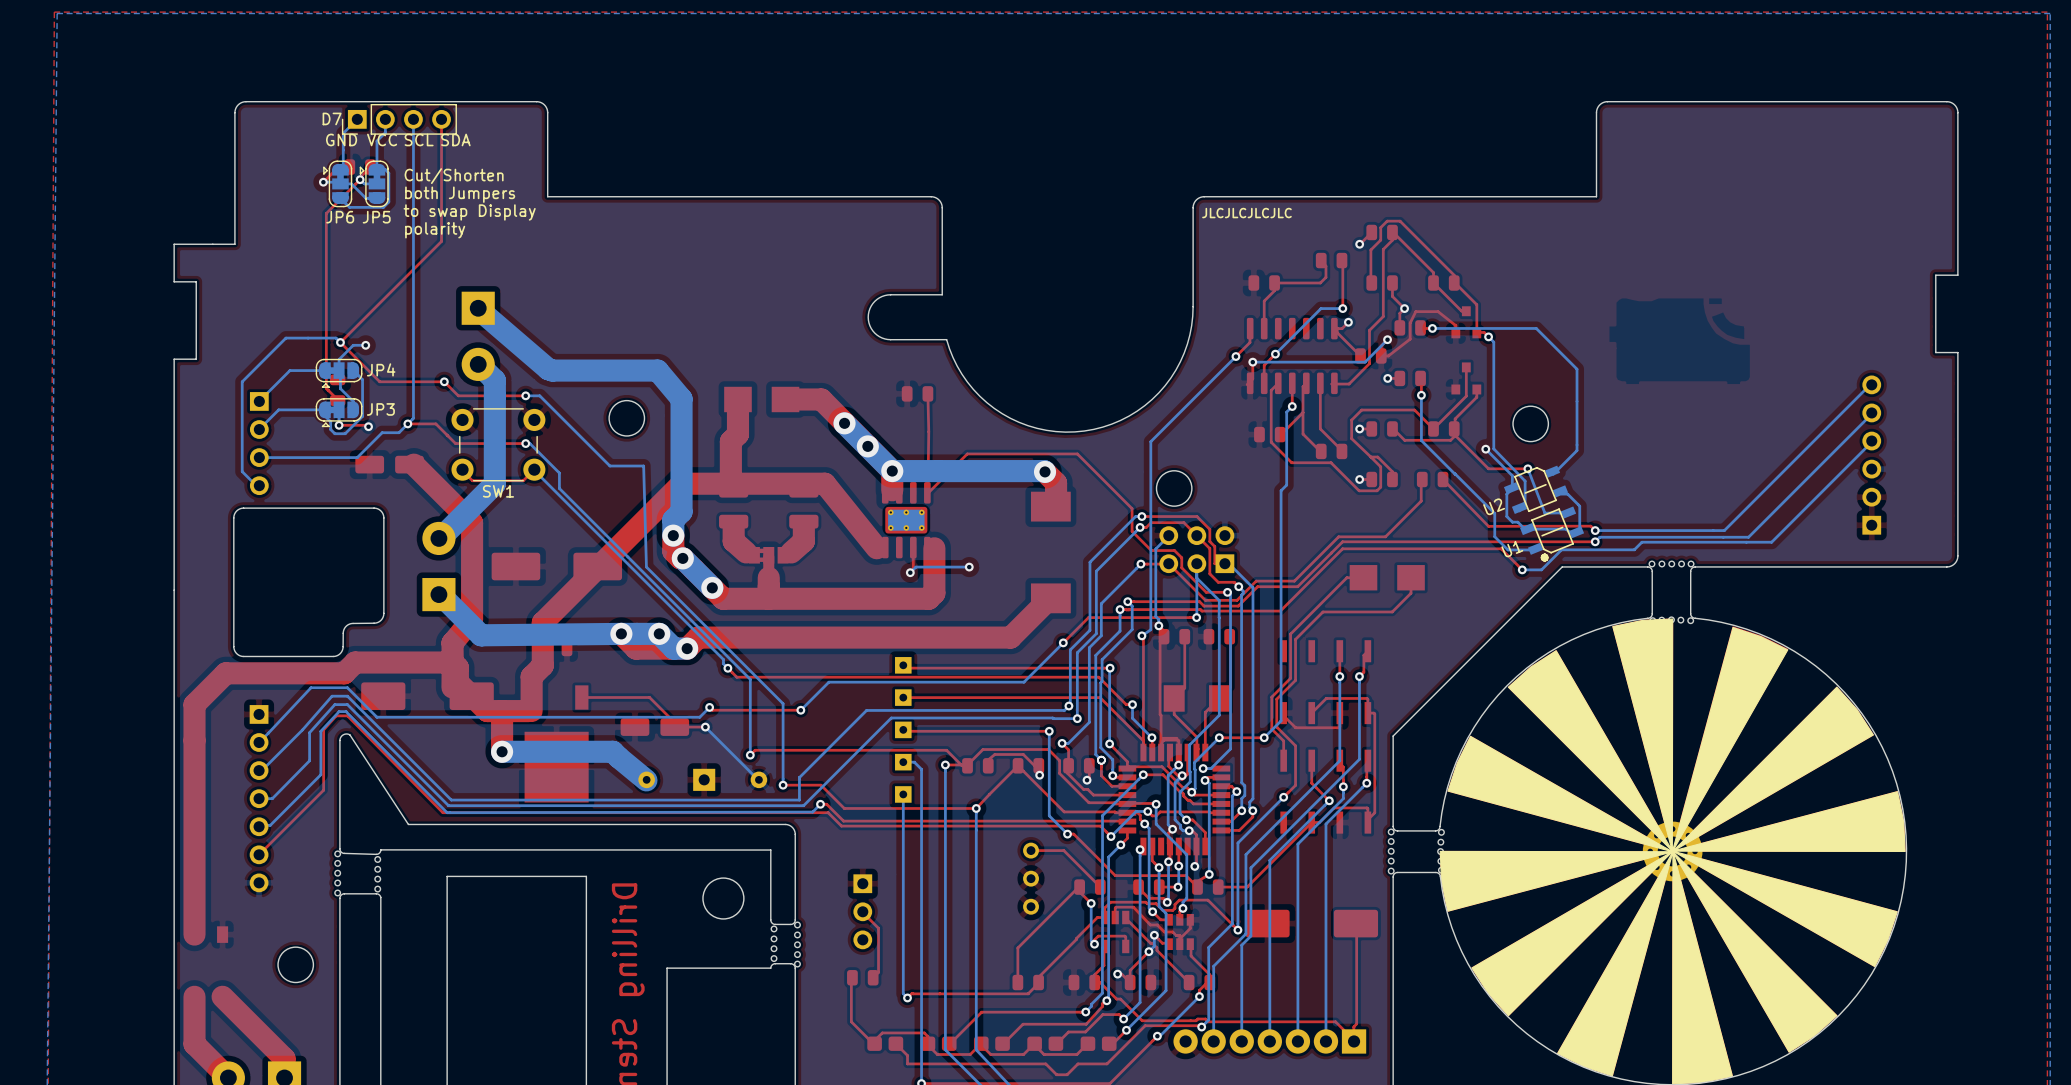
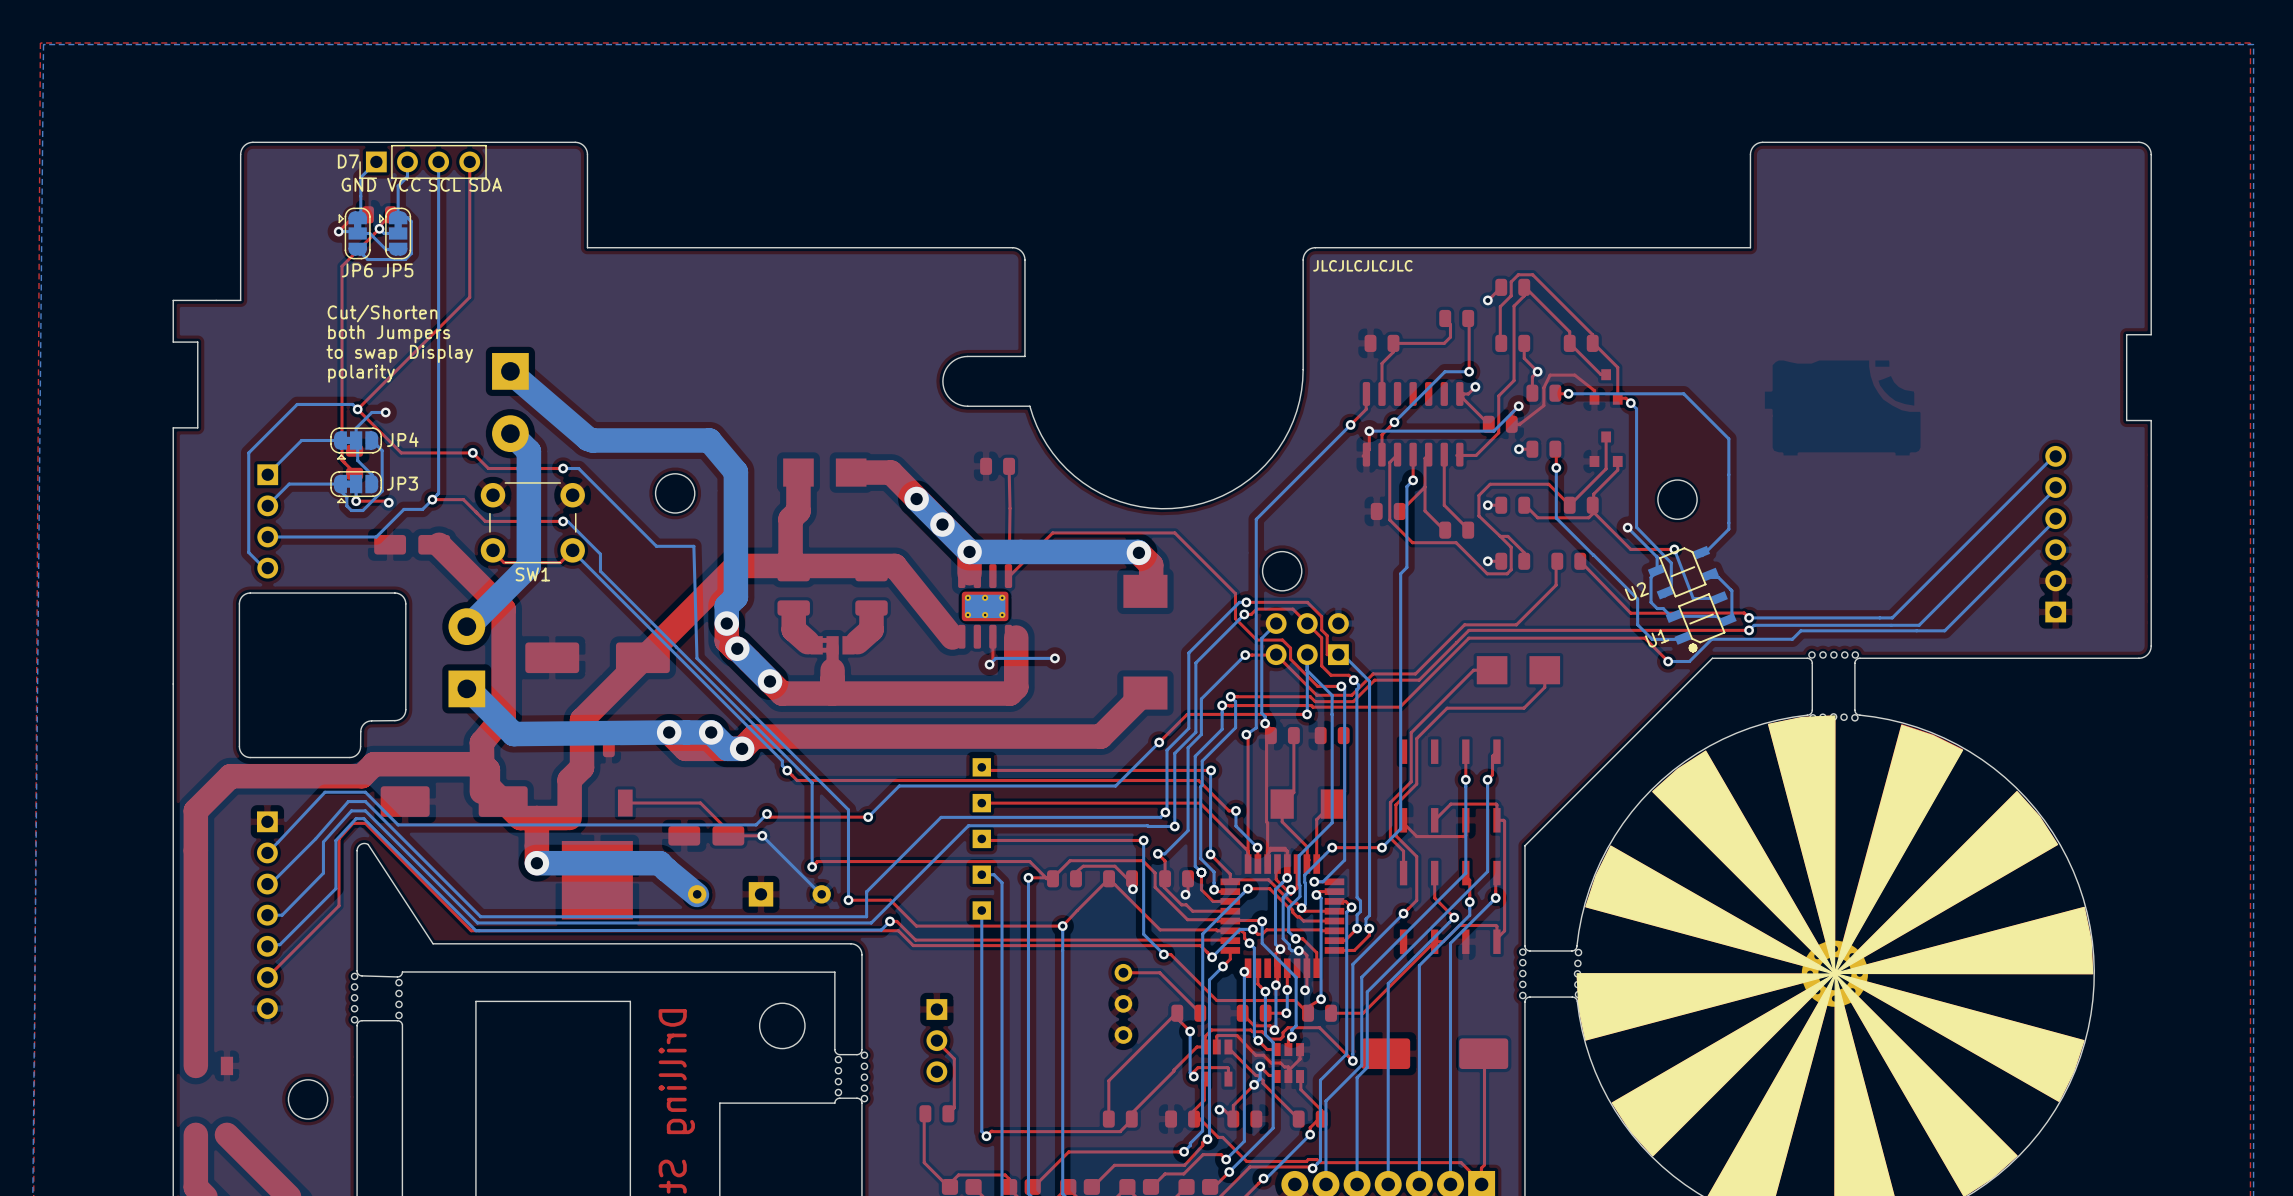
text position: Cut/Shorten (454, 176) -> Cut/Shorten (382, 313)
text position: both Jumpers (460, 194) -> both Jumpers (389, 334)
text position: to swap Display (469, 212) -> to swap Display (399, 353)
text position: polarity (435, 230) -> polarity (361, 373)

